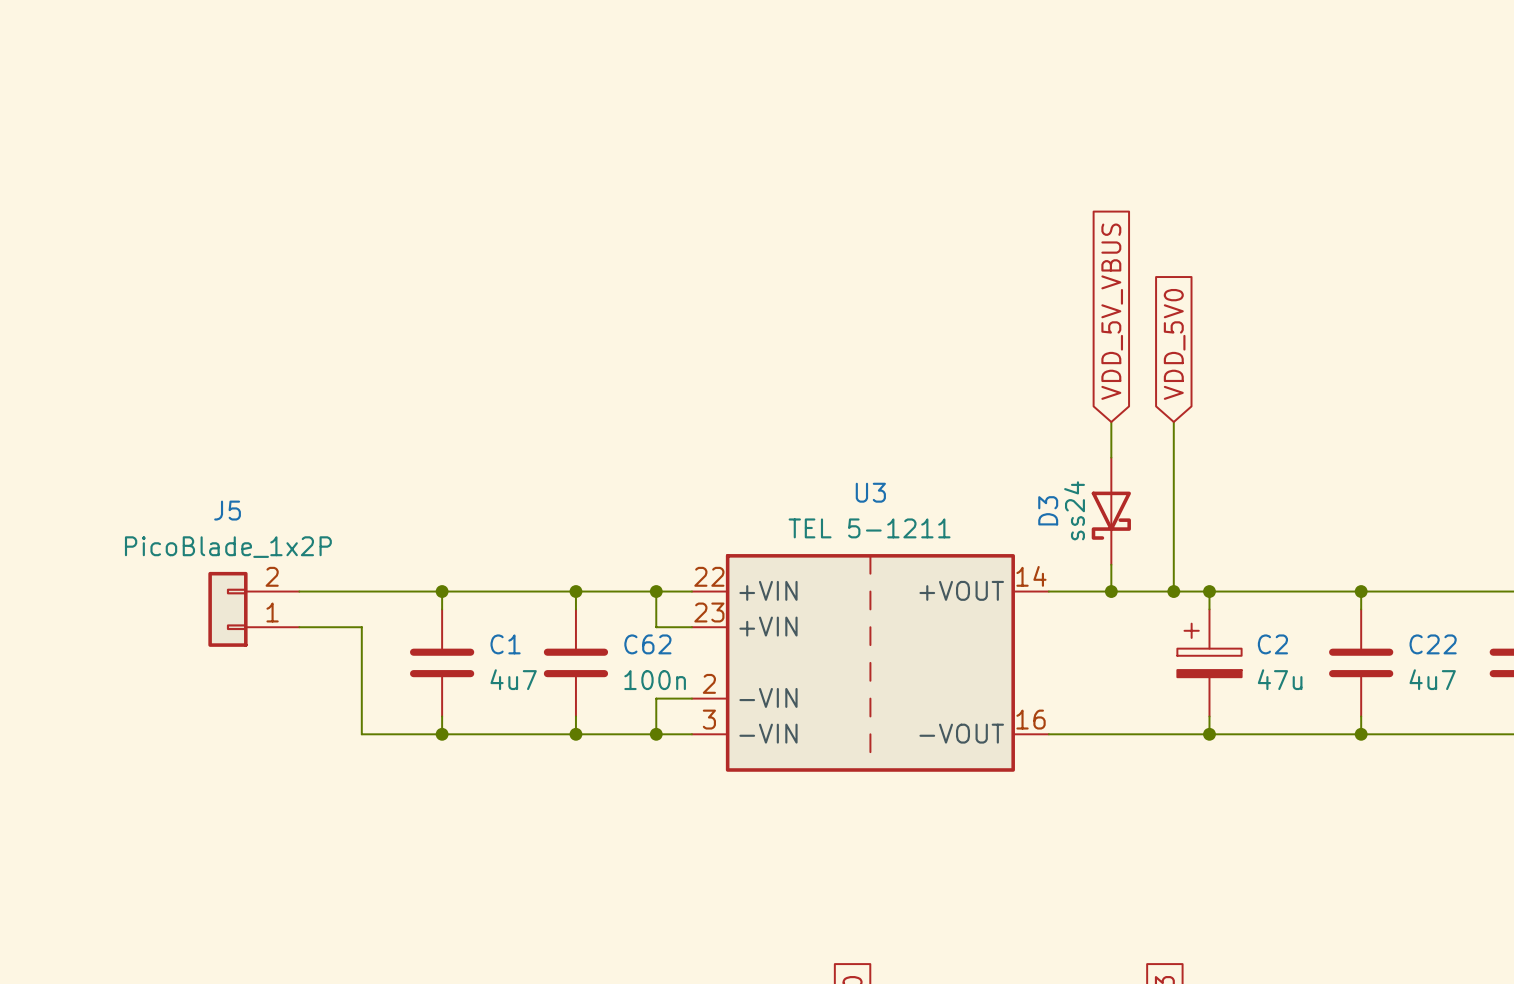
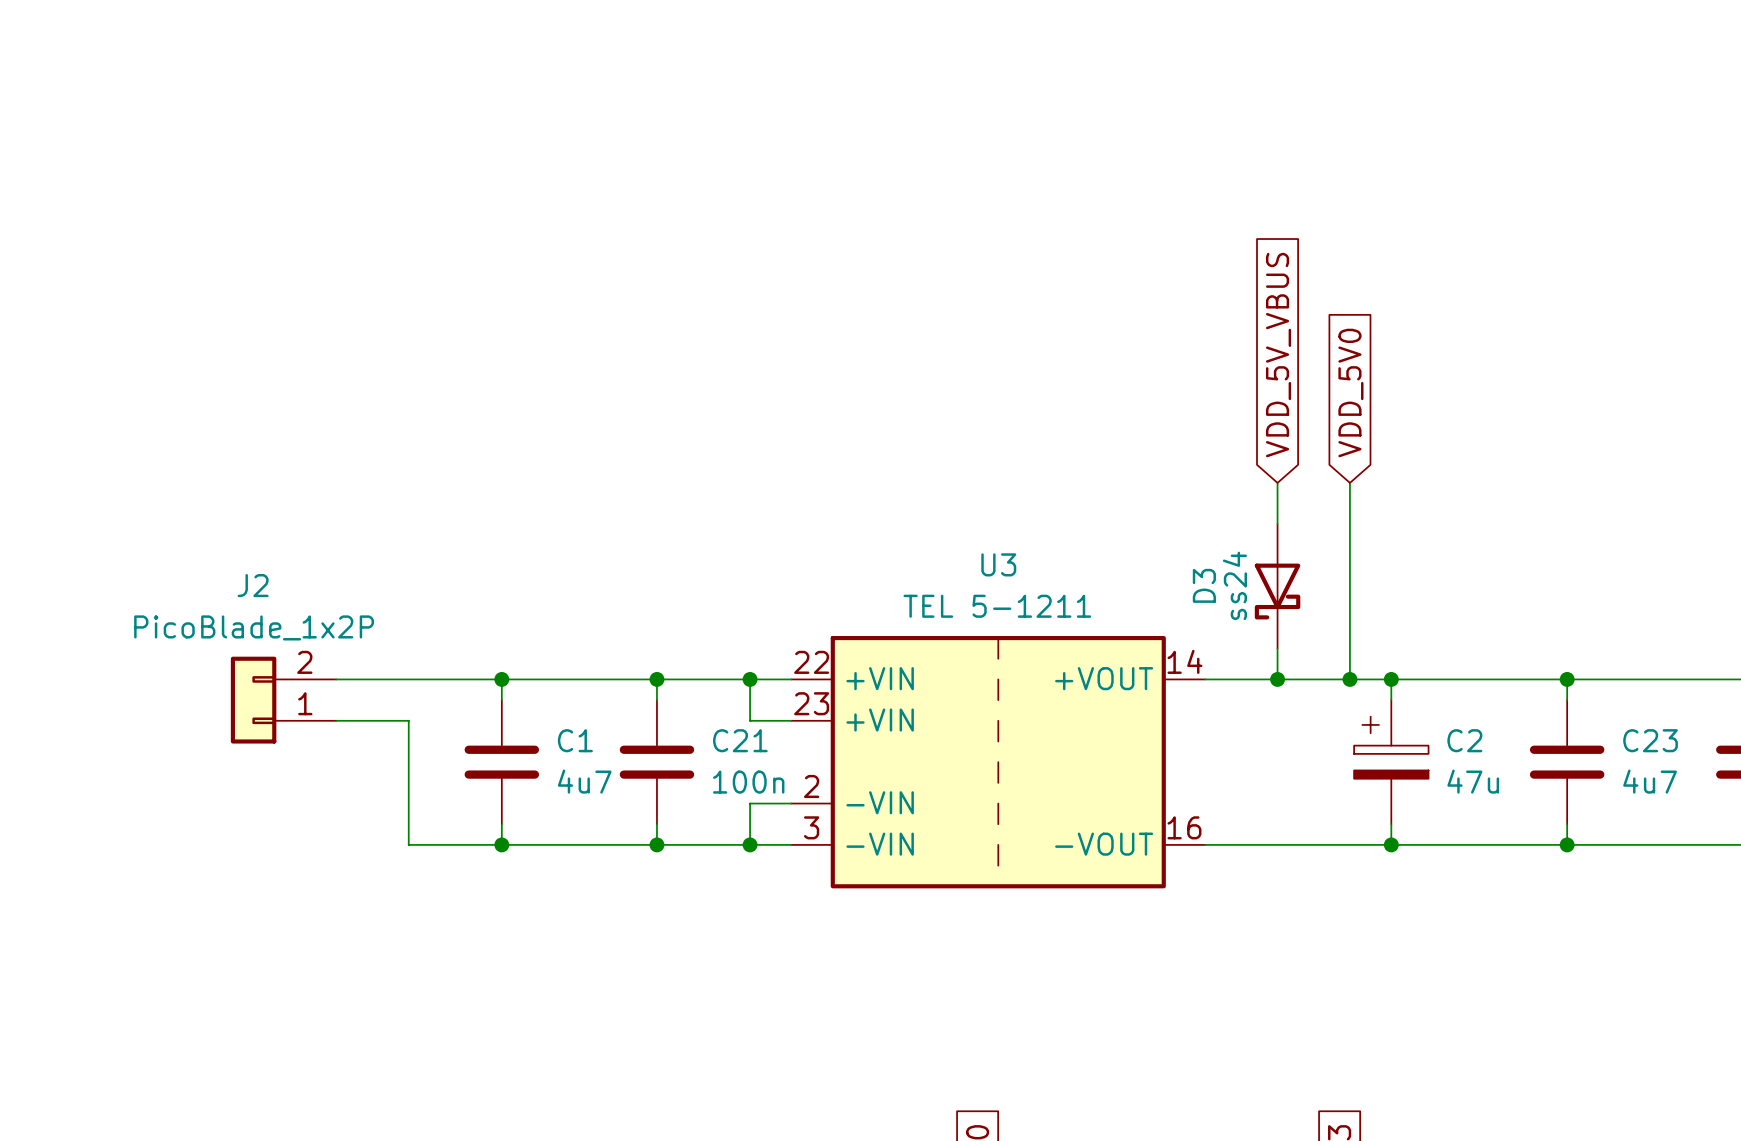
J5 name: J5 (227, 510) -> J2 (253, 585)
C62 name: C62 (647, 644) -> C21 (740, 740)
C22 name: C22 (1433, 644) -> C23 (1650, 740)

